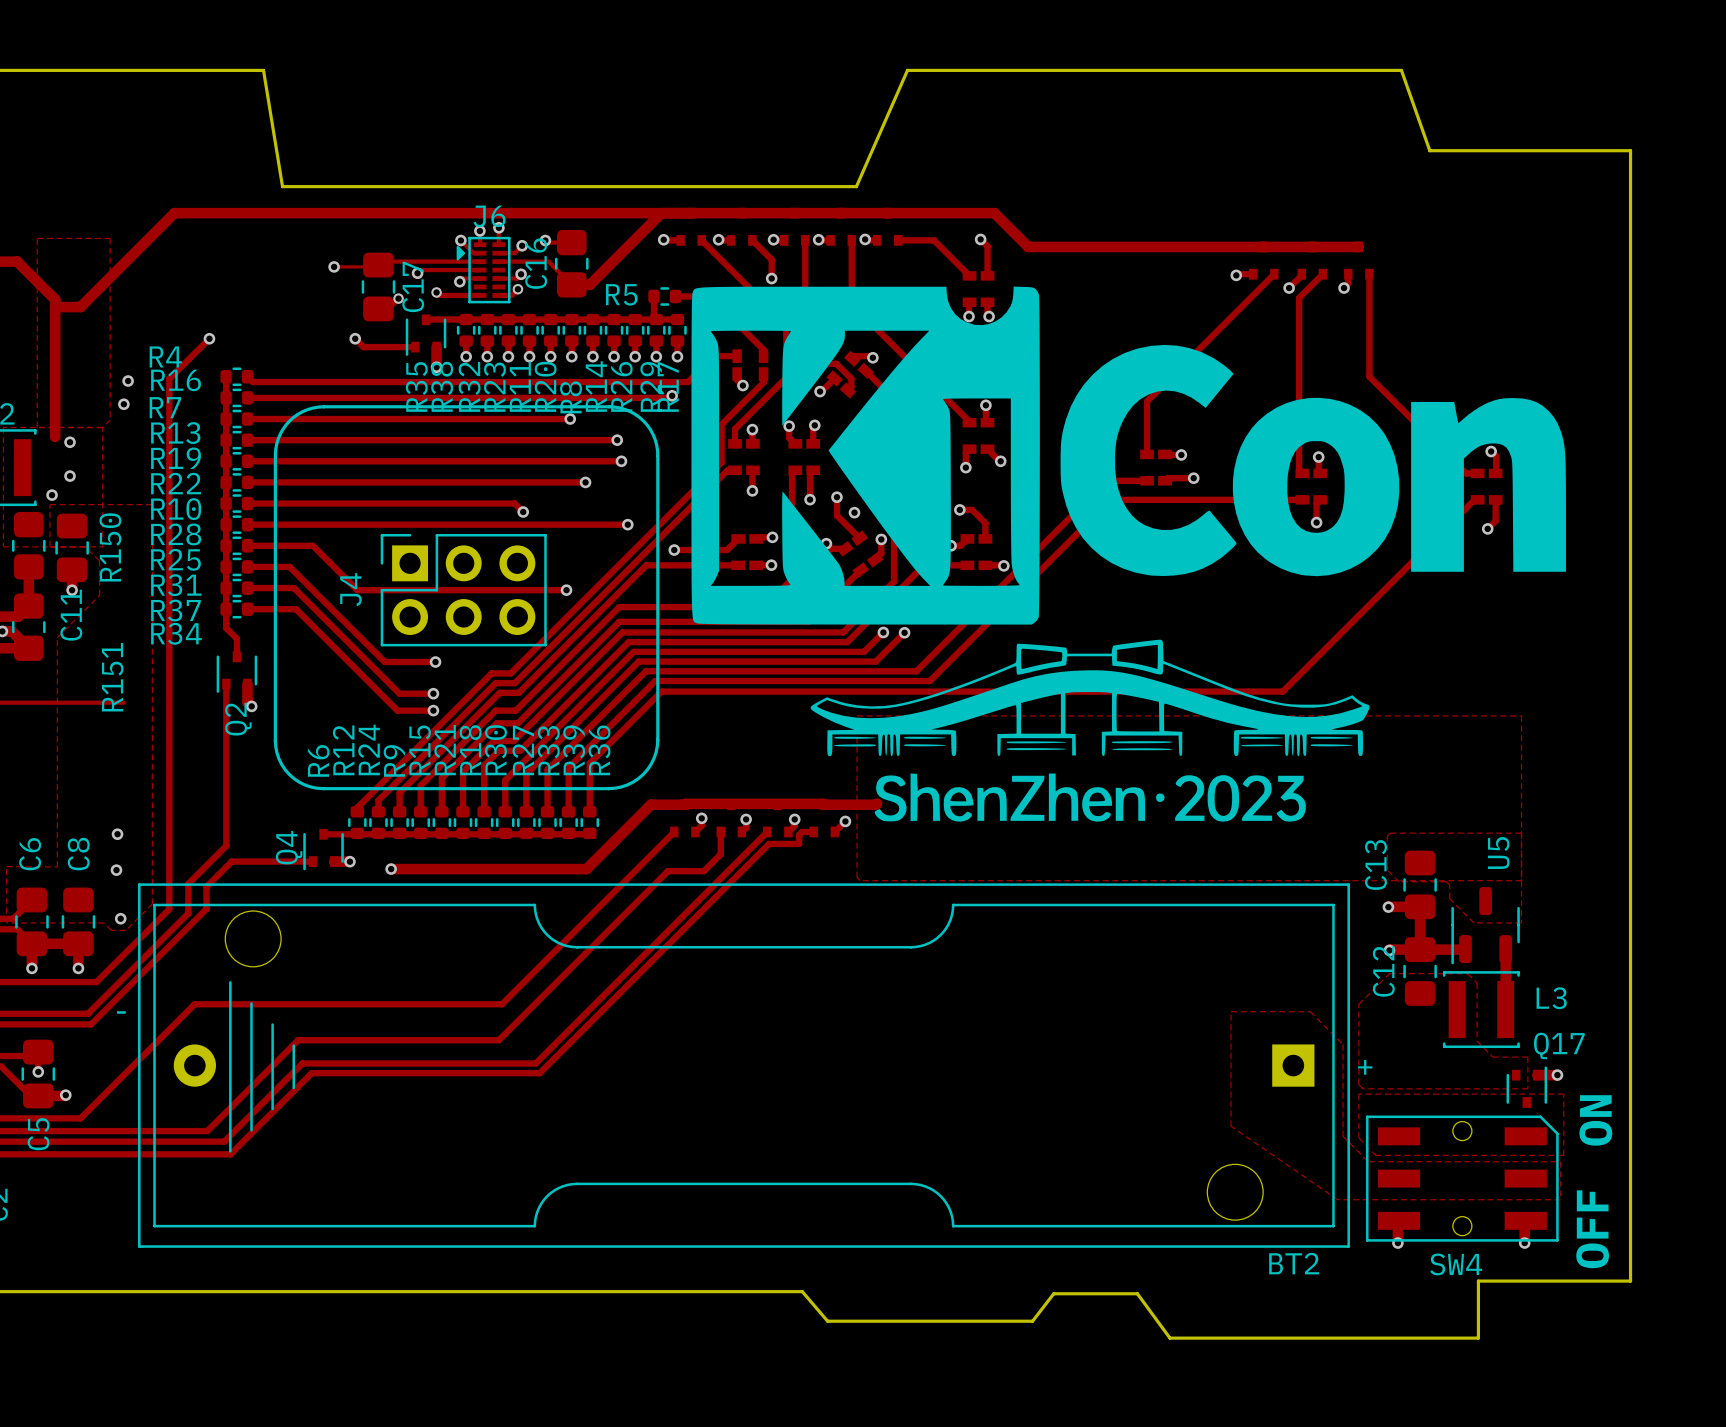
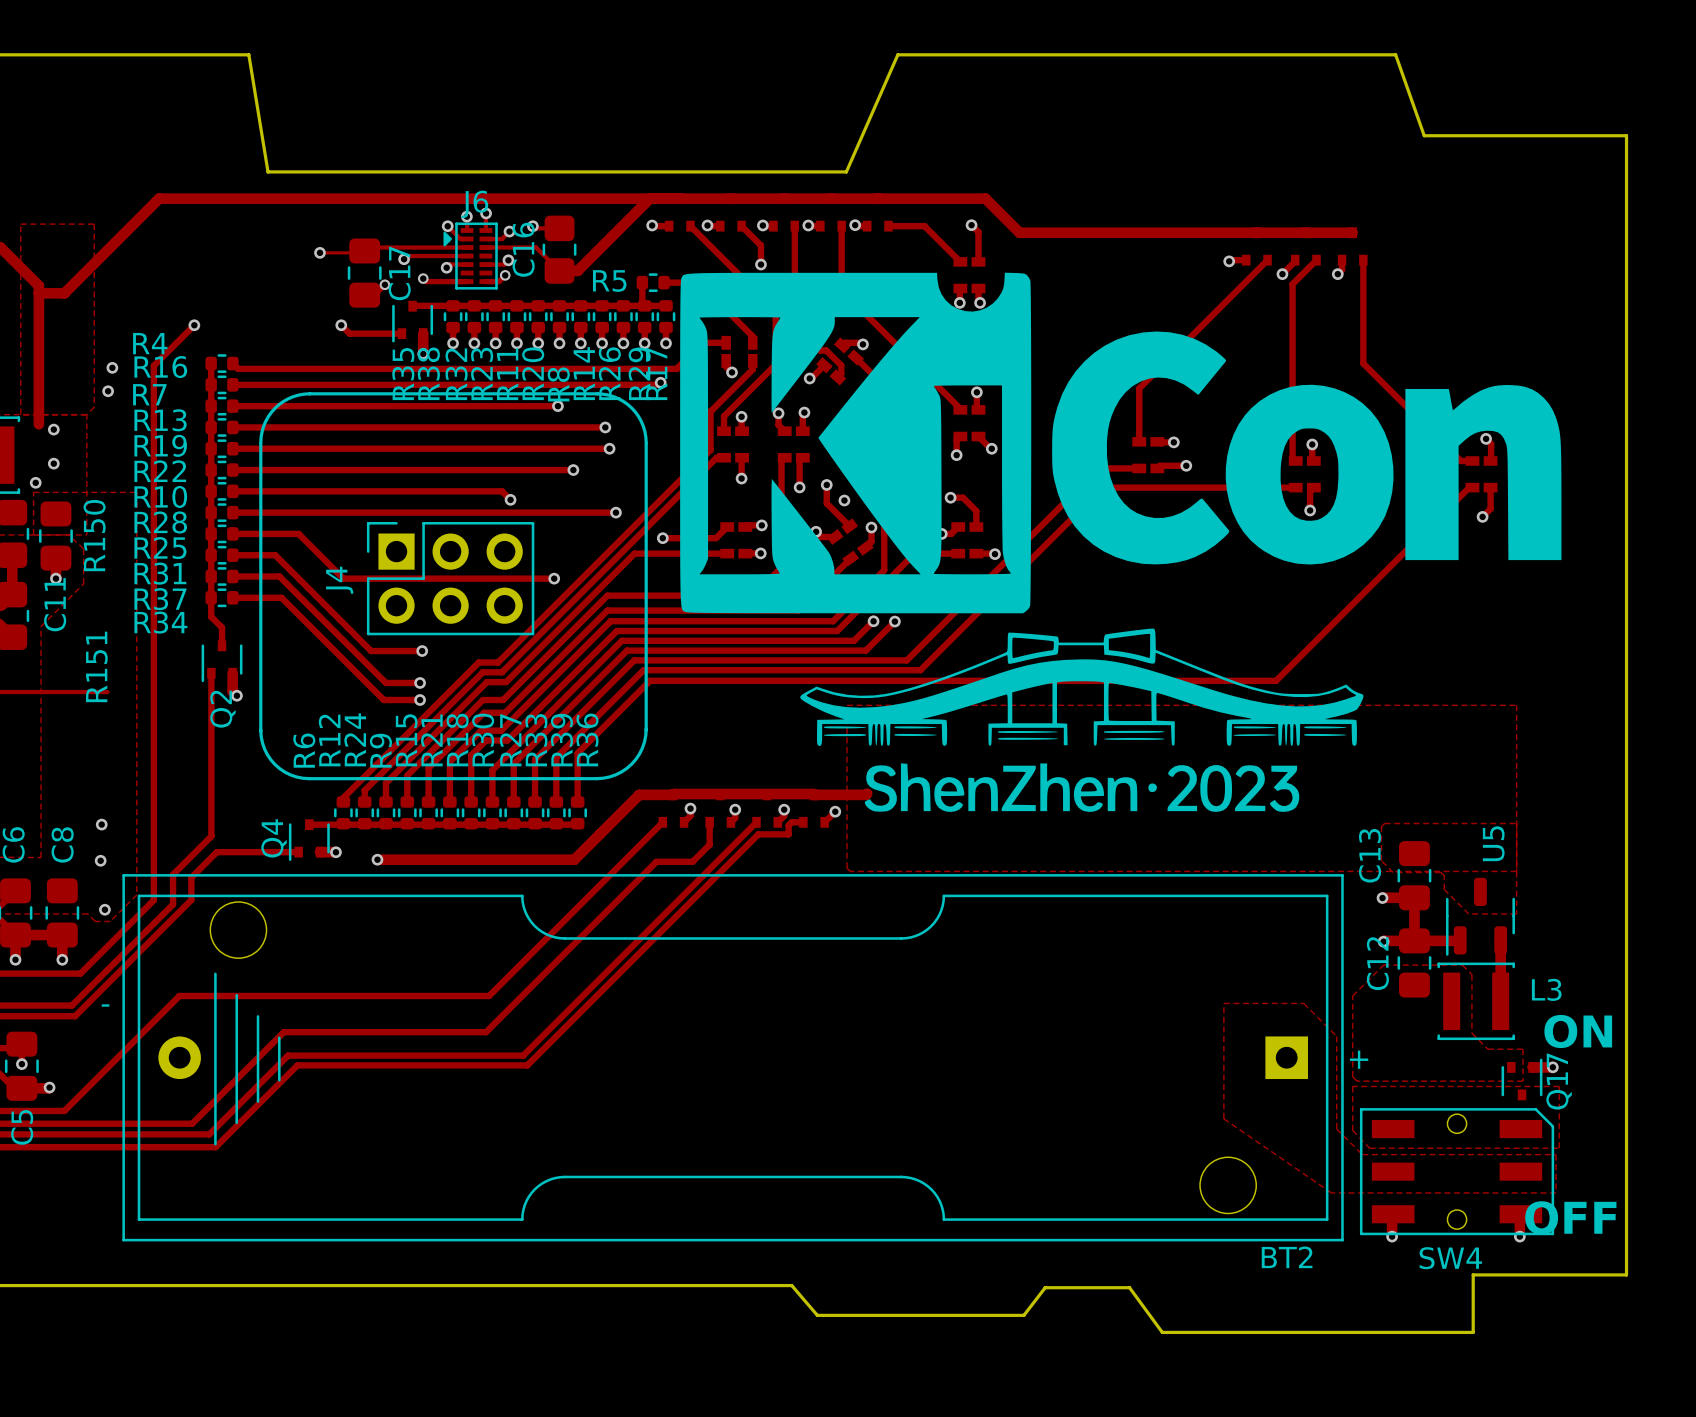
Q17 name rotation: 0° (1559, 1045) -> 90° counterclockwise (1559, 1081)
text rotation: 0° (1595, 1120) -> 90° clockwise (1578, 1031)
text rotation: 0° (1592, 1229) -> 90° clockwise (1570, 1217)

